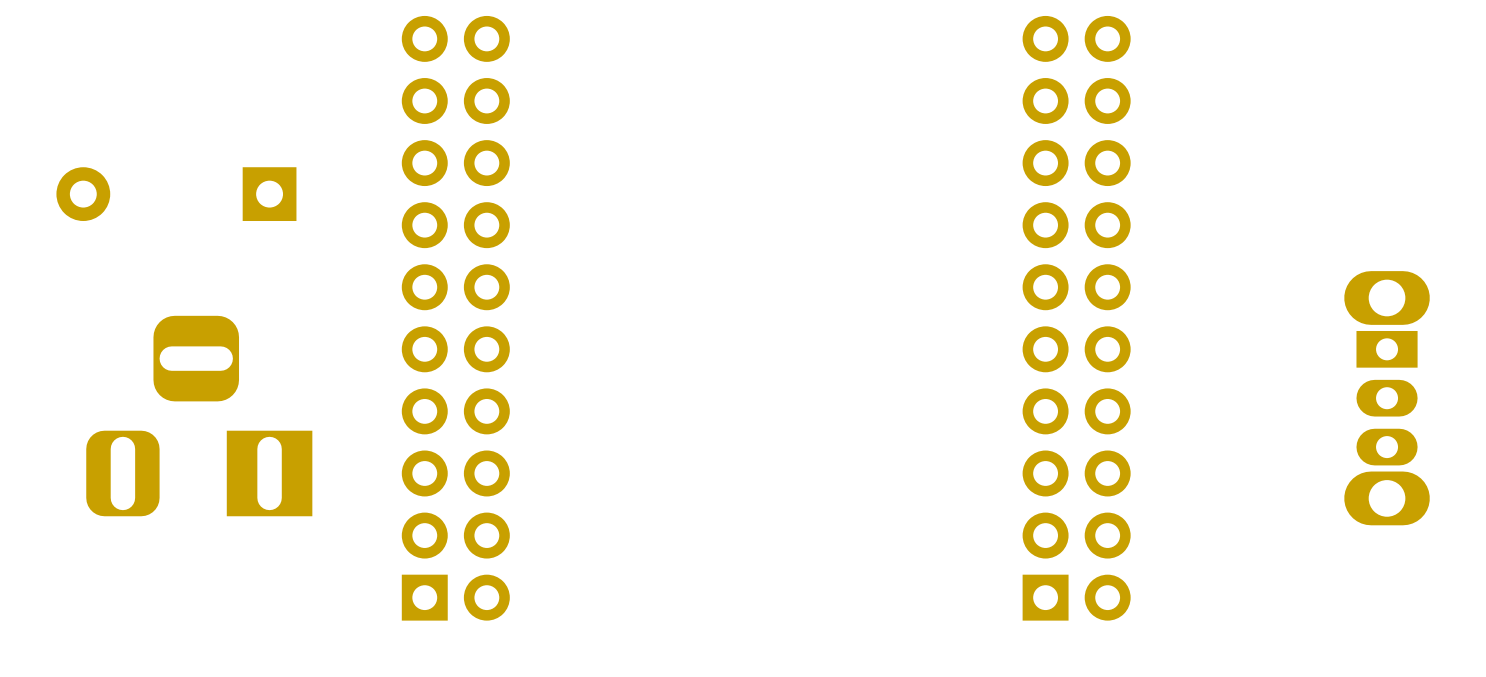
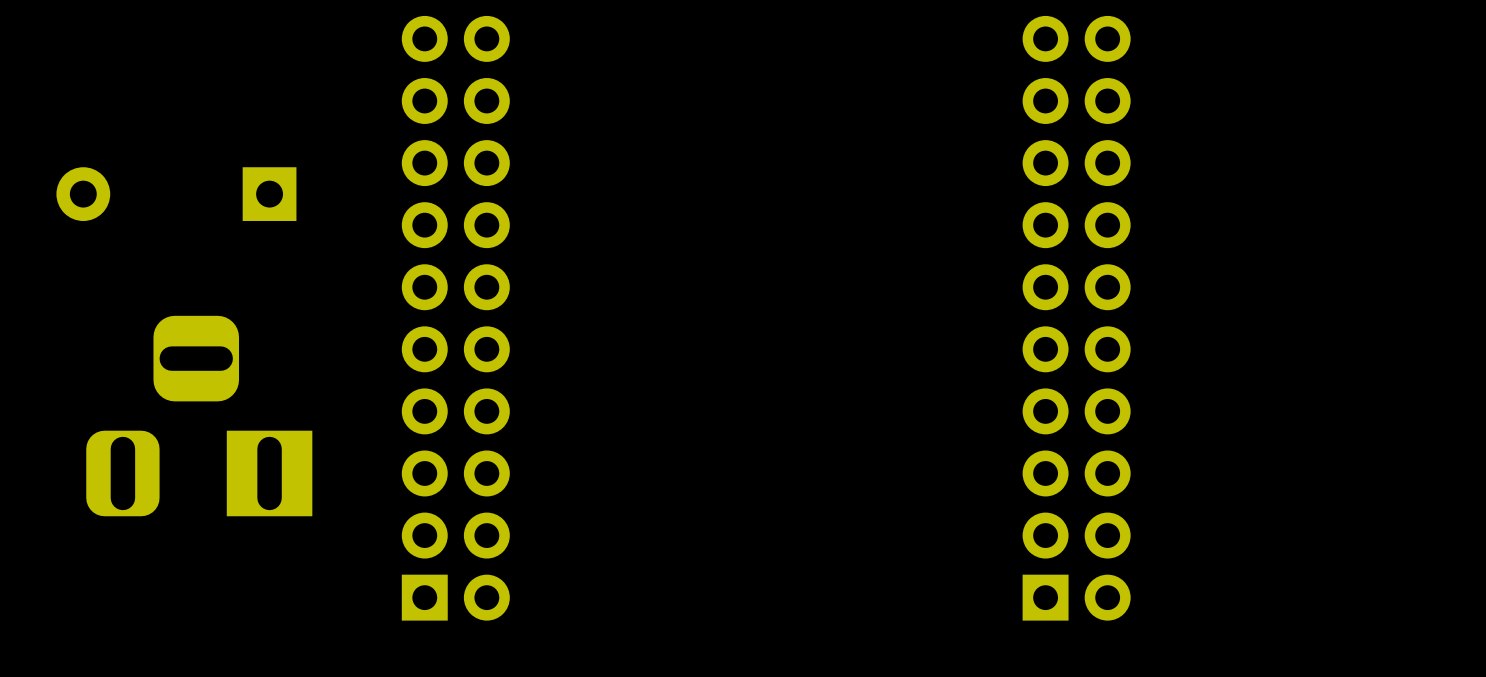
part: (1387, 398) -> none

